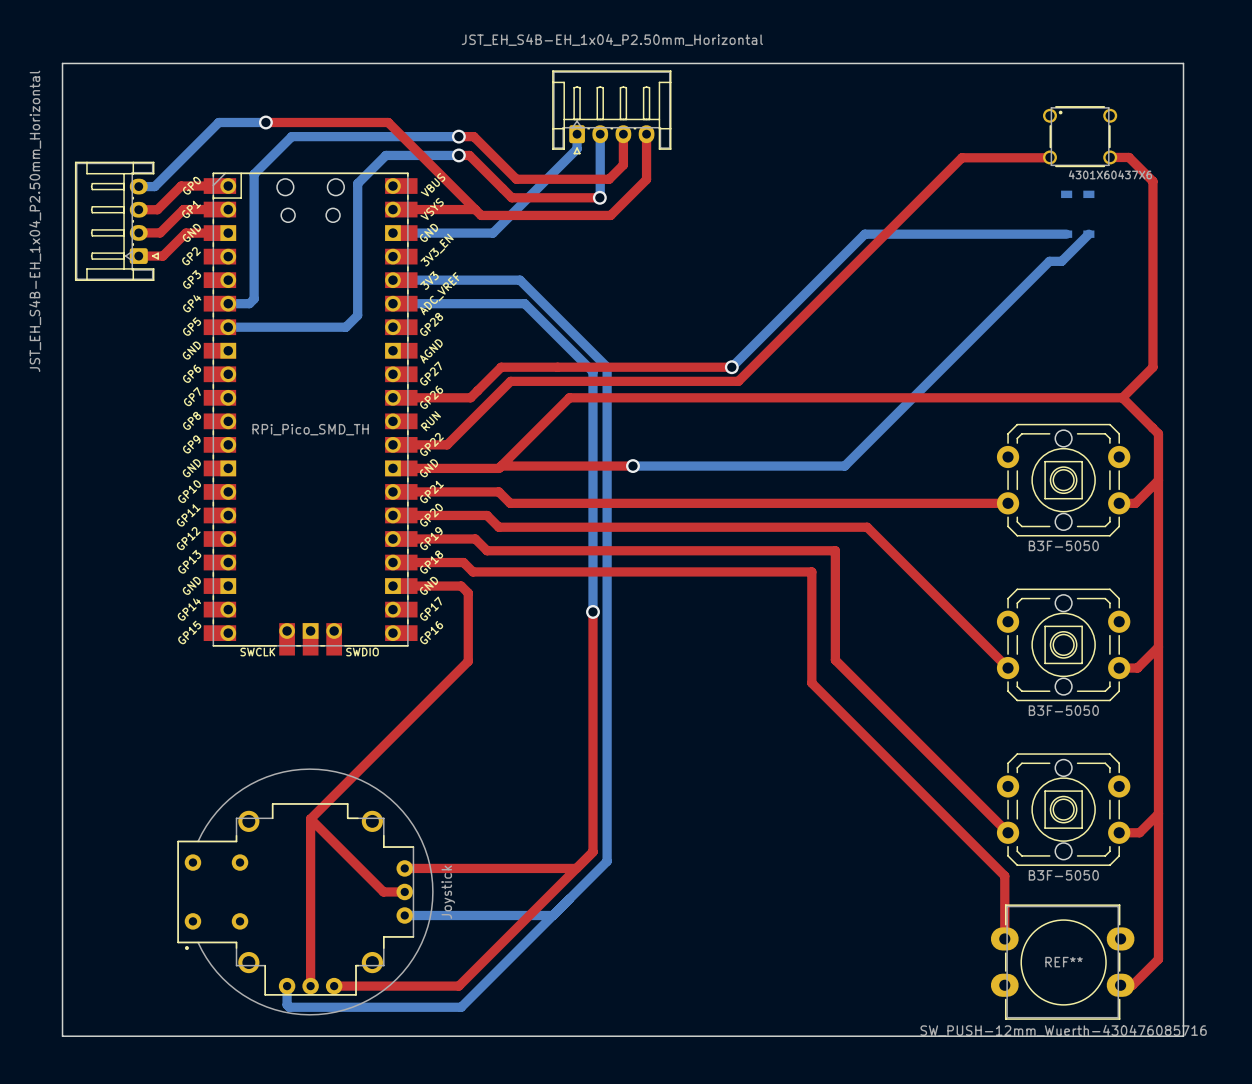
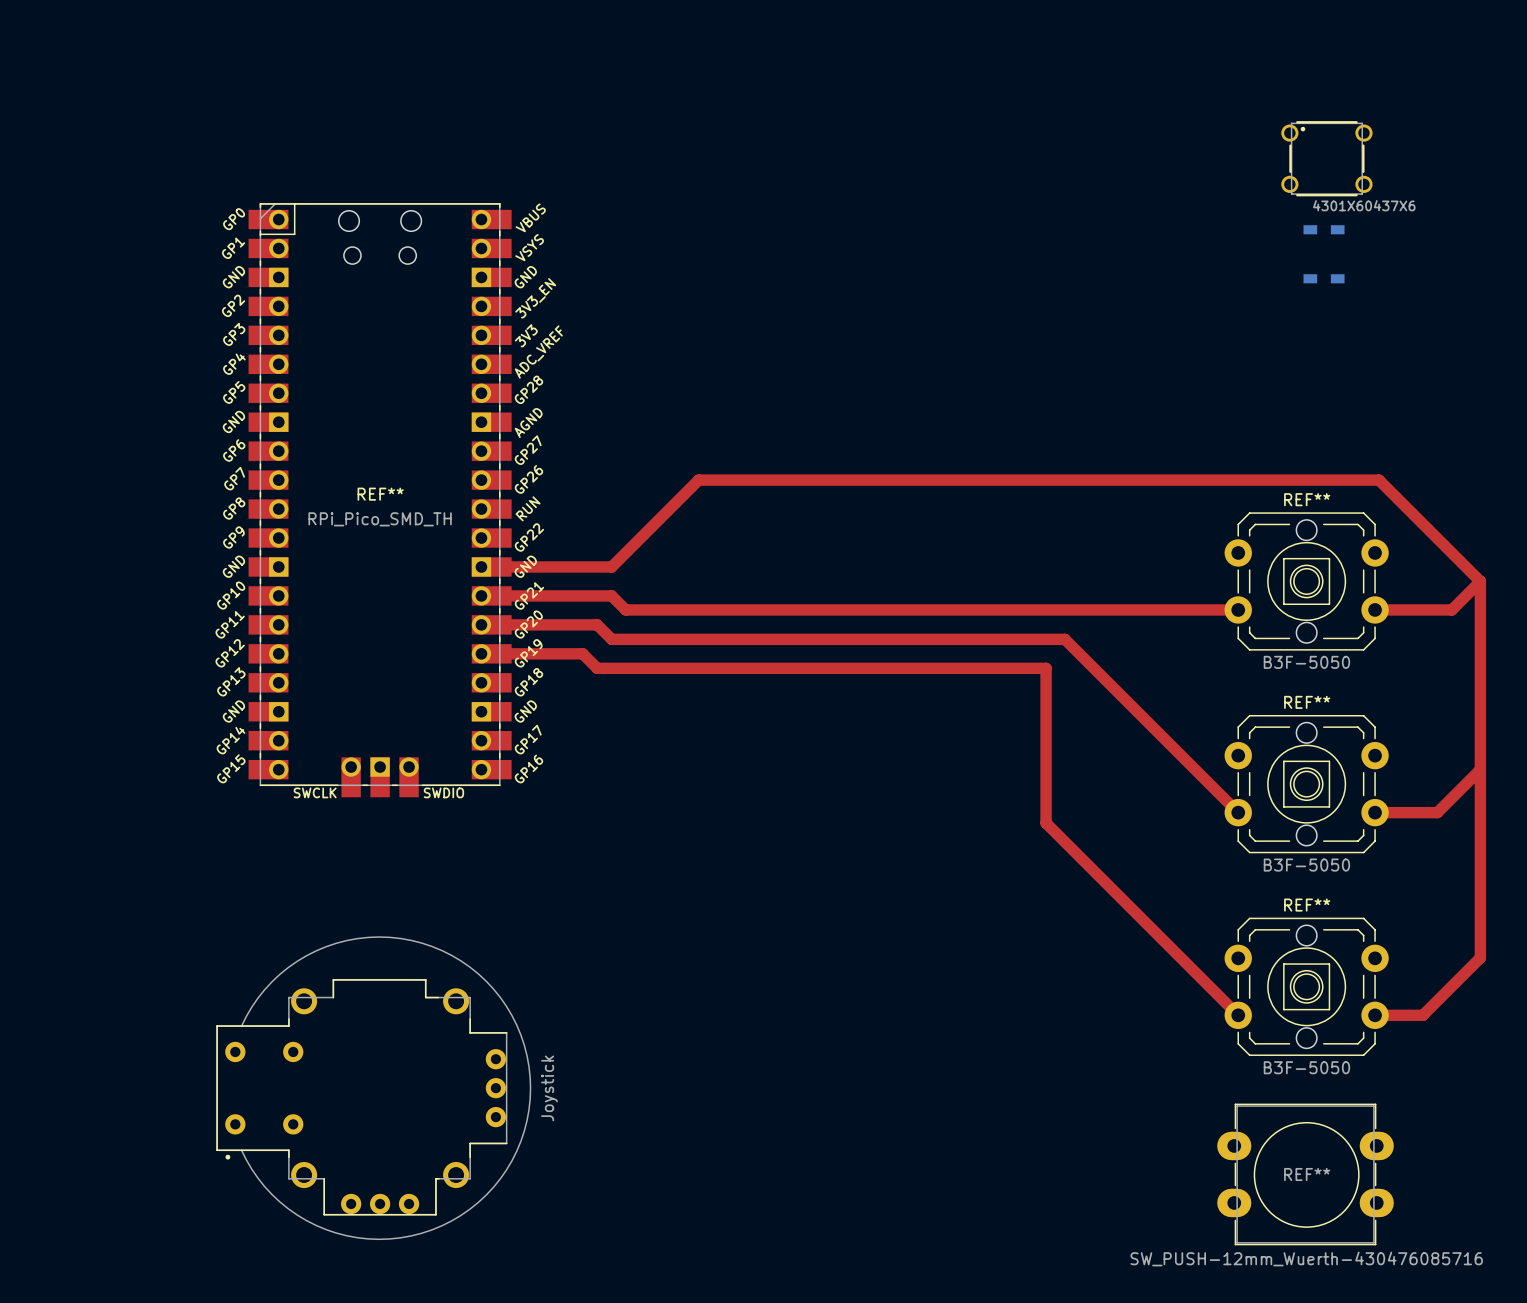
board edge: (62, 63) (1183, 63) (1183, 1036) (62, 1036) (62, 63) -> none
part: JST_EH_S4B-EH_1x04_P2.50mm_Horizontal (611, 112) -> none
top track: (265, 122) (388, 122) (481, 215) (610, 215) (646, 179) (646, 134) -> none
bottom track: (265, 122) (218, 122) (154, 186) (138, 186) -> none
via: (265, 122) -> none
bottom track: (577, 134) (577, 149) (492, 233) (392, 233) -> none
bottom track: (600, 134) (599, 197) -> none
top track: (623, 134) (623, 164) (609, 179) (516, 179) (473, 136) (458, 136) -> none
bottom track: (458, 136) (291, 136) (254, 174) (254, 298) (249, 303) (228, 303) -> none
via: (458, 136) -> none
top track: (458, 155) (469, 155) (511, 197) (599, 197) -> none
bottom track: (458, 155) (385, 155) (357, 183) (357, 315) (345, 327) (228, 327) -> none
via: (458, 155) -> none
top track: (1049, 157) (961, 157) (738, 381) (510, 381) (447, 444) (392, 444) -> none
top track: (1110, 157) (1129, 157) (1152, 181) (1152, 367) (1122, 397) -> none
top track: (228, 186) (181, 186) (157, 209) (138, 209) -> none
via: (599, 197) -> none
top track: (228, 209) (183, 209) (160, 232) (138, 232) -> none
top track: (392, 209) (475, 209) -> none
part: JST_EH_S4B-EH_1x04_P2.50mm_Horizontal (116, 221) -> none
top track: (227, 233) (185, 233) (162, 256) (138, 256) -> none
bottom track: (1066, 234) (864, 234) (731, 367) -> none
bottom track: (1088, 234) (1061, 261) (1049, 261) (844, 466) (632, 466) -> none
bottom track: (392, 280) (520, 280) (607, 367) (607, 861) (461, 1007) (289, 1007) (287, 1004) (287, 986) -> none
bottom track: (392, 303) (524, 303) (592, 371) (592, 611) -> none
top track: (731, 367) (501, 367) (470, 397) (392, 397) -> none
via: (731, 367) -> none
REF** name: none -> REF** (380, 494)
REF** name: none -> REF** (1307, 499)
top track: (1158, 433) (1158, 959) (1132, 985) (1120, 985) -> (1423, 524) (1480, 581)
top track: (501, 466) (632, 466) -> none
via: (632, 466) -> none
top track: (1158, 480) (1135, 503) -> (1480, 581) (1451, 609) (1395, 609)
top track: (835, 550) (835, 660) (851, 676) -> (1025, 668) (1046, 668) (1046, 823)
top track: (392, 562) (463, 562) (472, 571) (811, 571) (811, 683) (1004, 876) (1004, 938) -> none
REF** name: none -> REF** (1307, 702)
top track: (392, 586) (461, 586) (468, 593) (468, 661) (310, 819) -> none
top track: (592, 611) (592, 851) (458, 986) (334, 986) -> none
via: (592, 611) -> none
top track: (1158, 647) (1137, 668) -> (1480, 769) (1437, 812) (1397, 812)
REF** name: none -> REF** (1307, 905)
top track: (1158, 813) (1139, 832) -> (1480, 581) (1480, 957) (1422, 1015) (1400, 1015)
top track: (310, 819) (310, 986) -> none
top track: (310, 819) (383, 891) (404, 891) -> none
top track: (404, 868) (576, 868) -> none
bottom track: (404, 915) (552, 915) -> none

